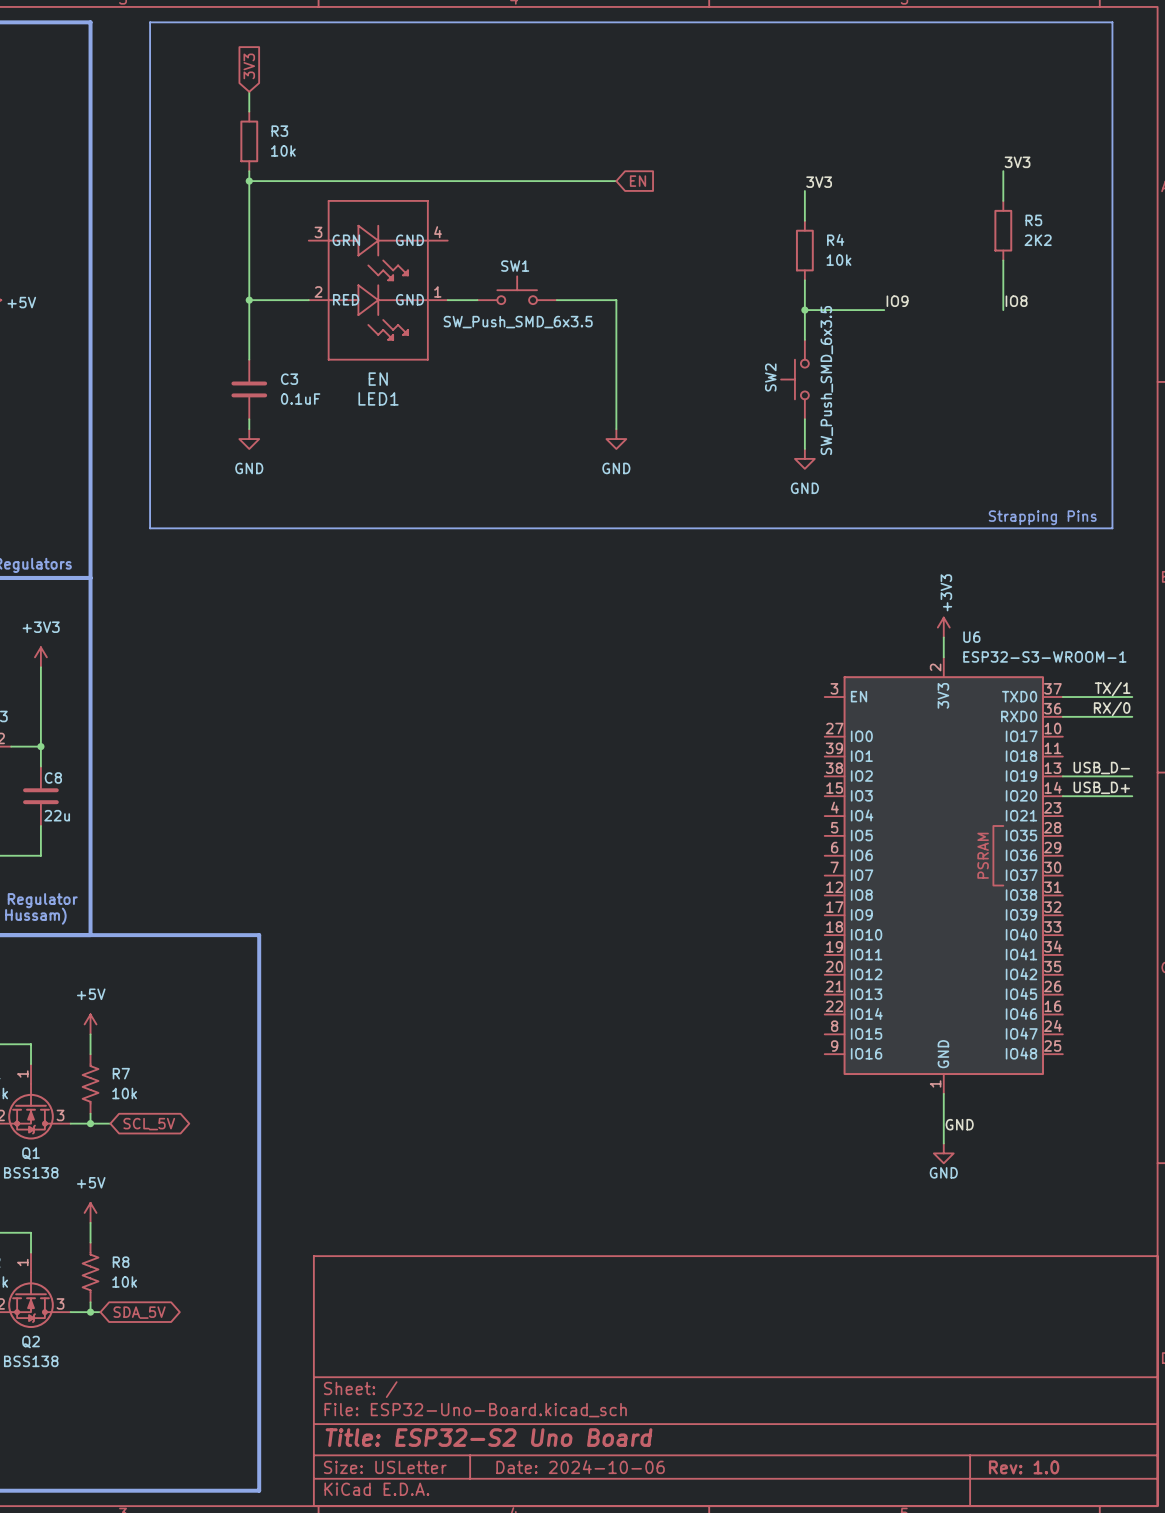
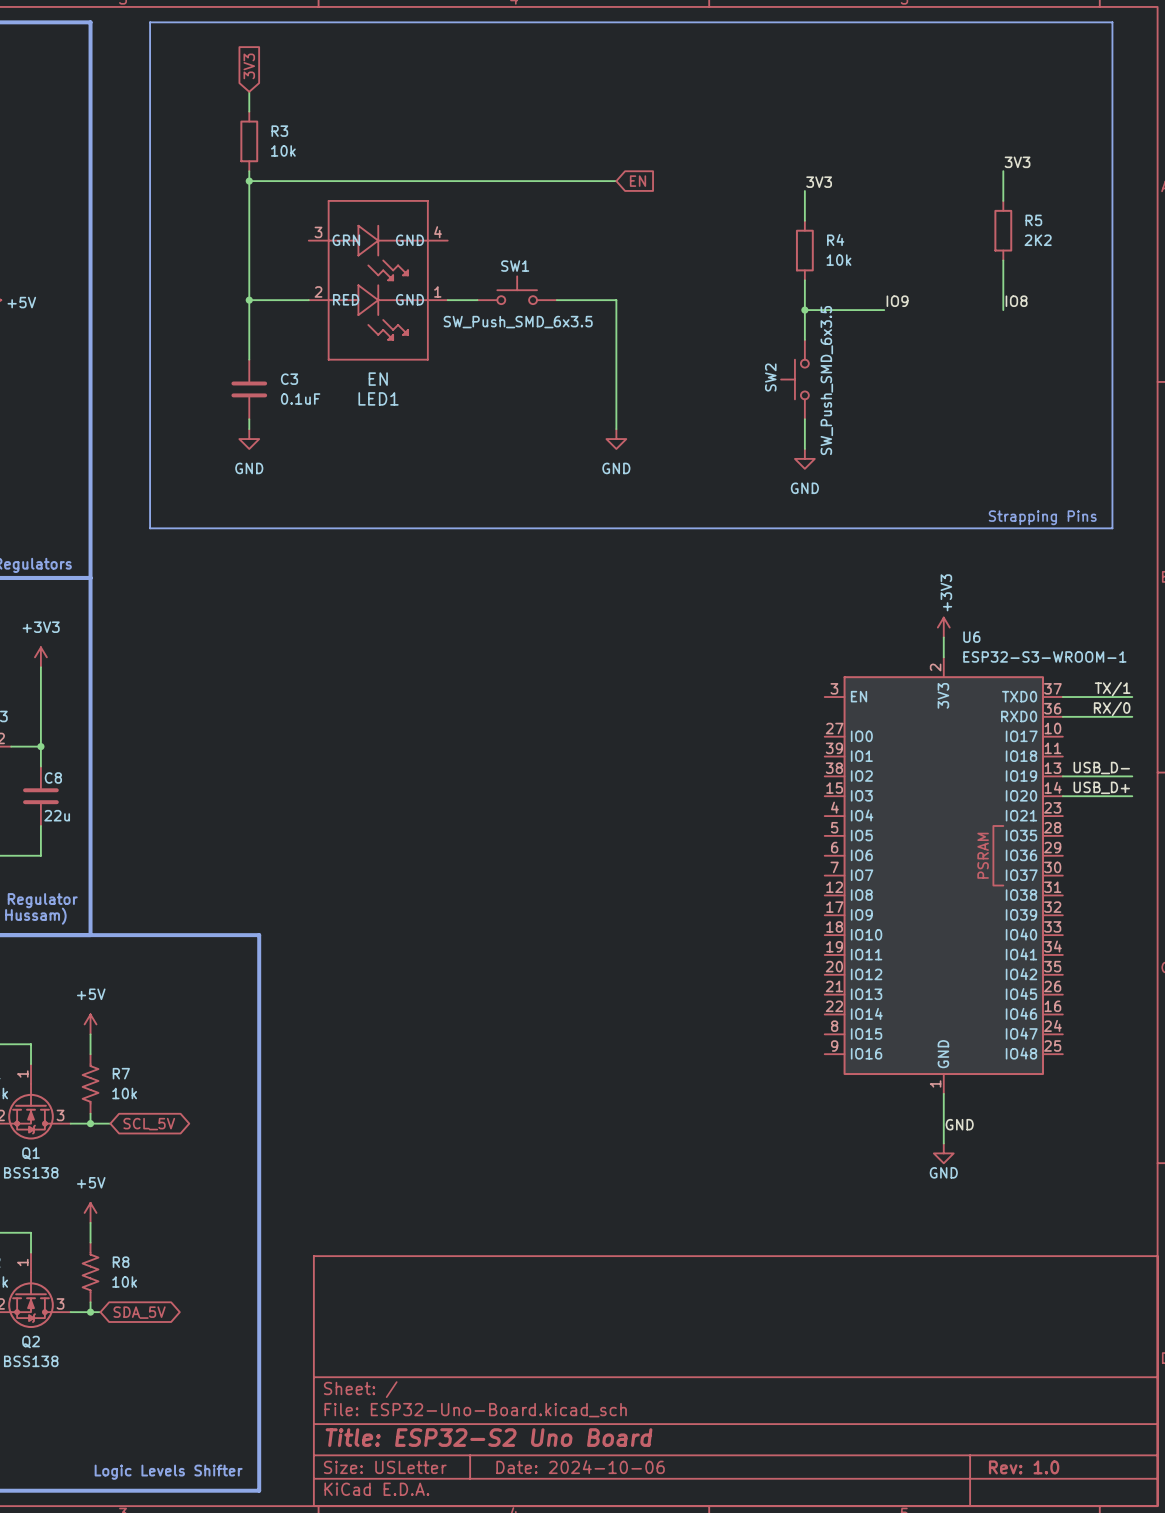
text: none -> Logic Levels Shifter (168, 1472)

